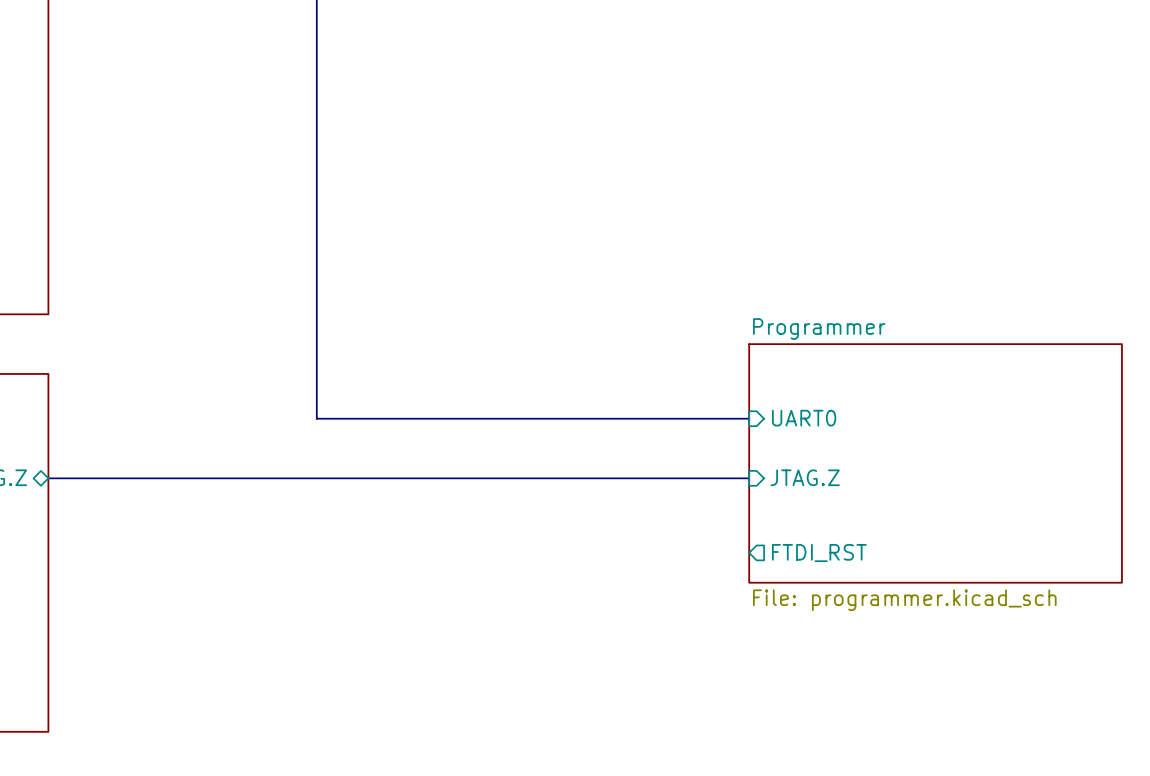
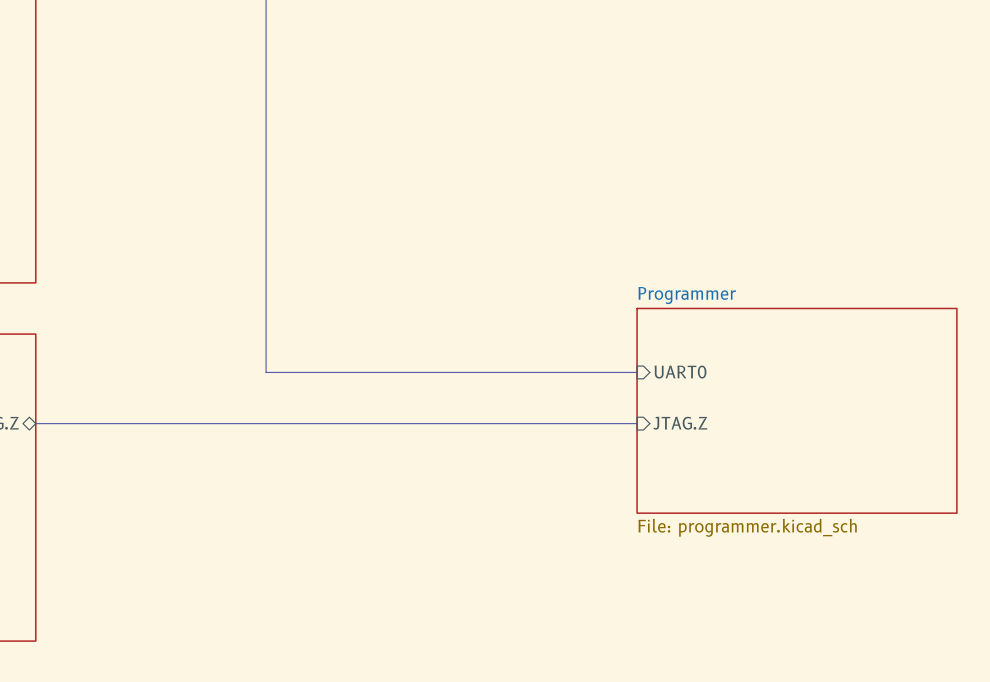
sheet pin: FTDI_RST (819, 553) -> none

